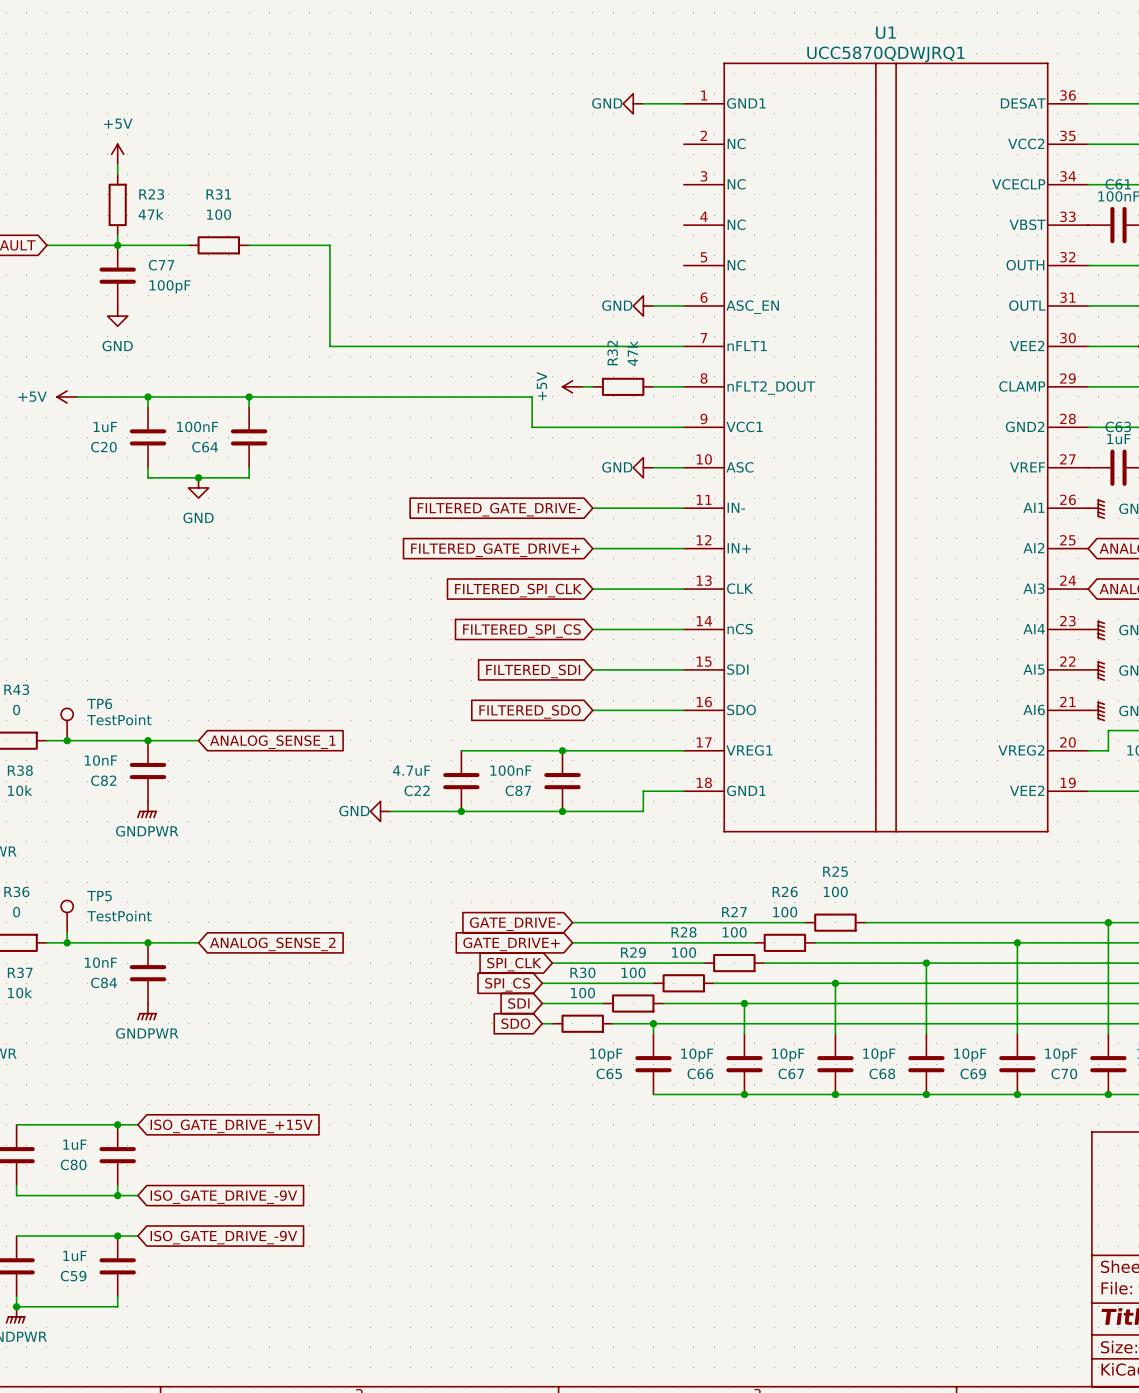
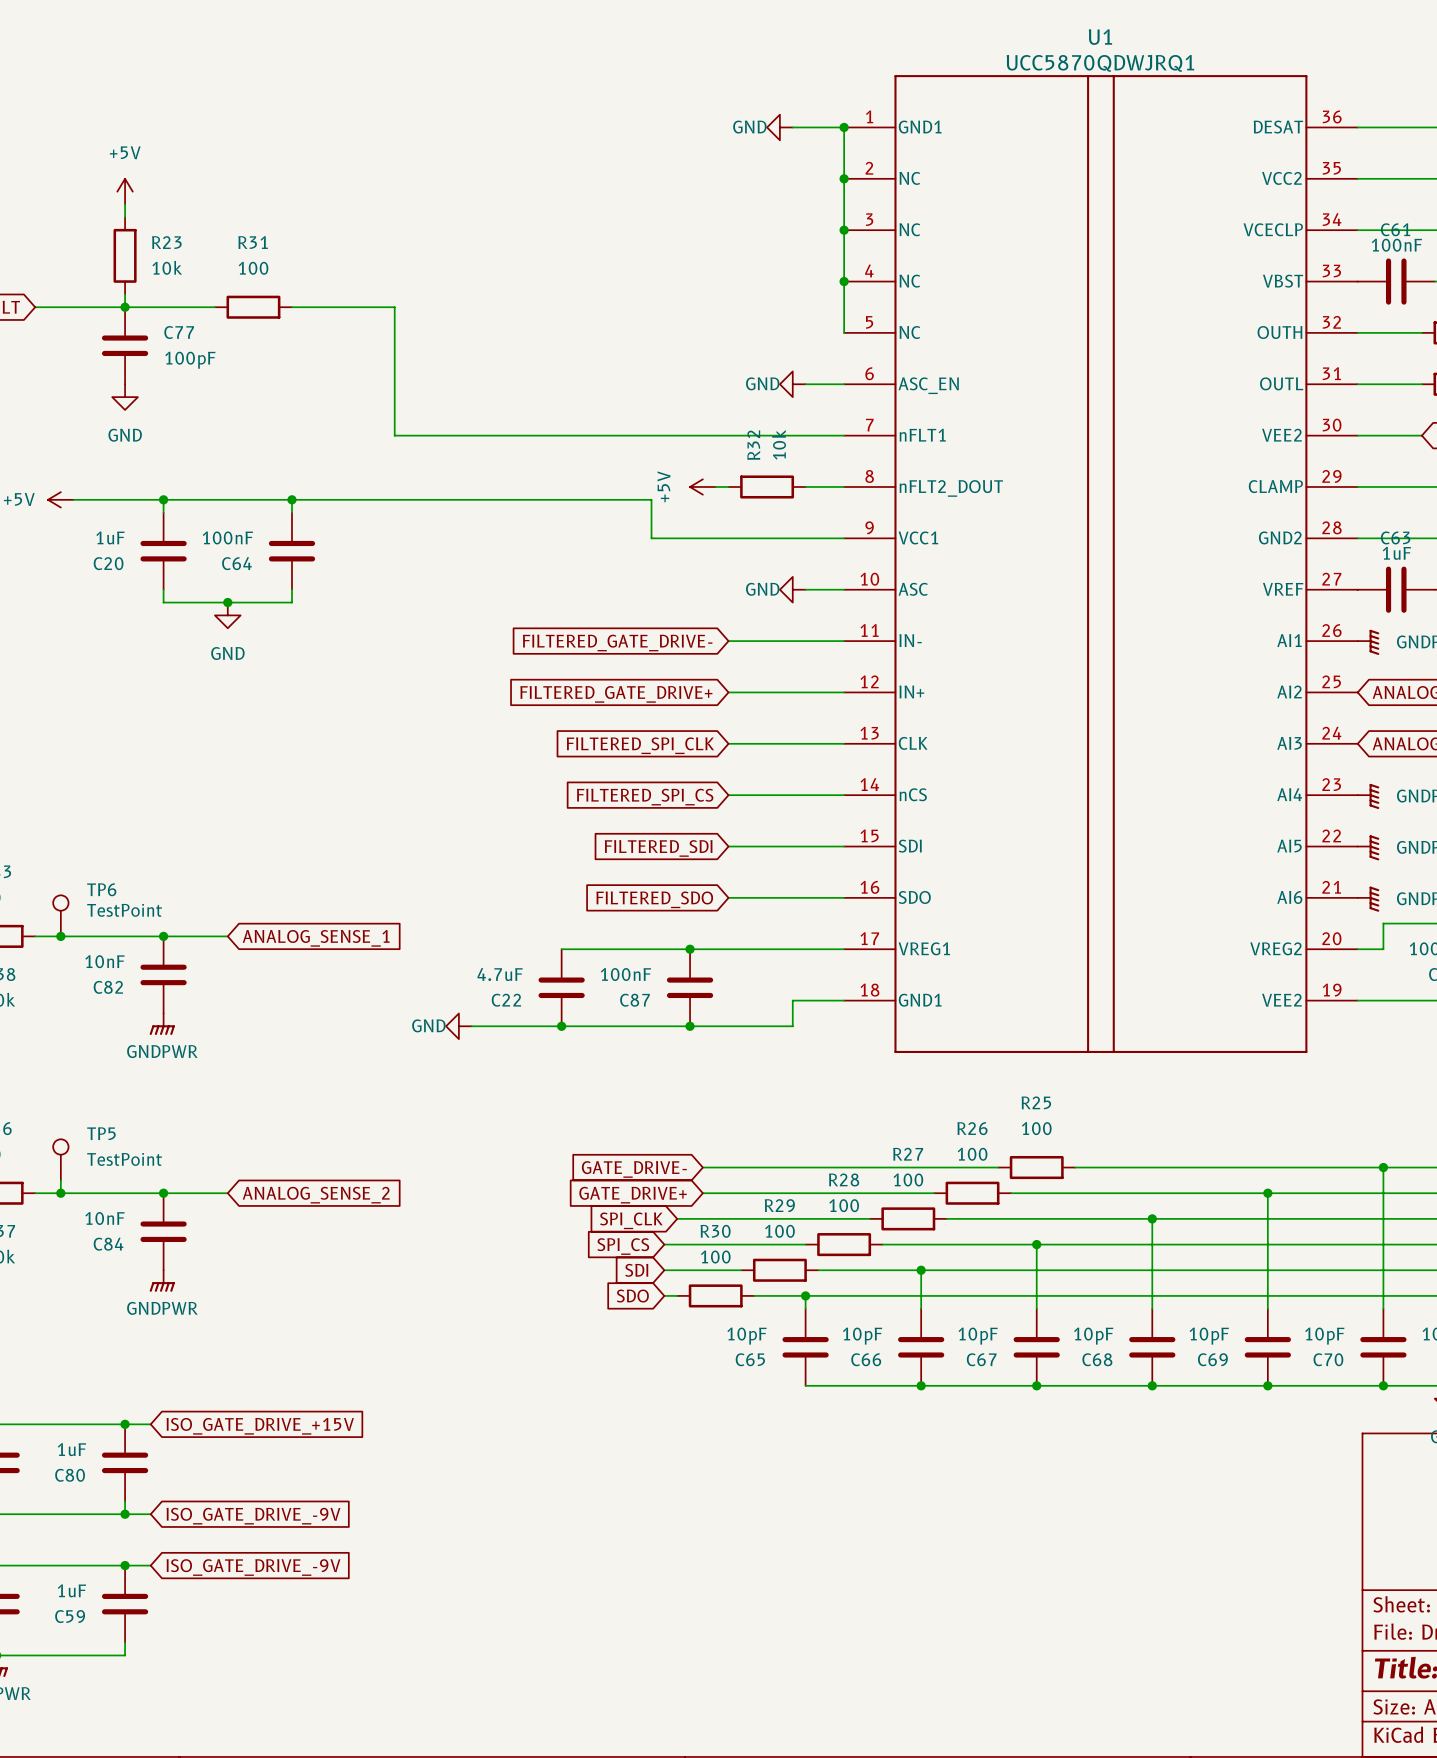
wire: none -> (844, 127) (844, 332)
junction: none -> (844, 127)
junction: none -> (844, 178)
junction: none -> (844, 230)
R23 value: 47k (151, 214) -> 10k (167, 267)
junction: none -> (844, 281)
R32 value: 47k (632, 353) -> 10k (779, 444)

